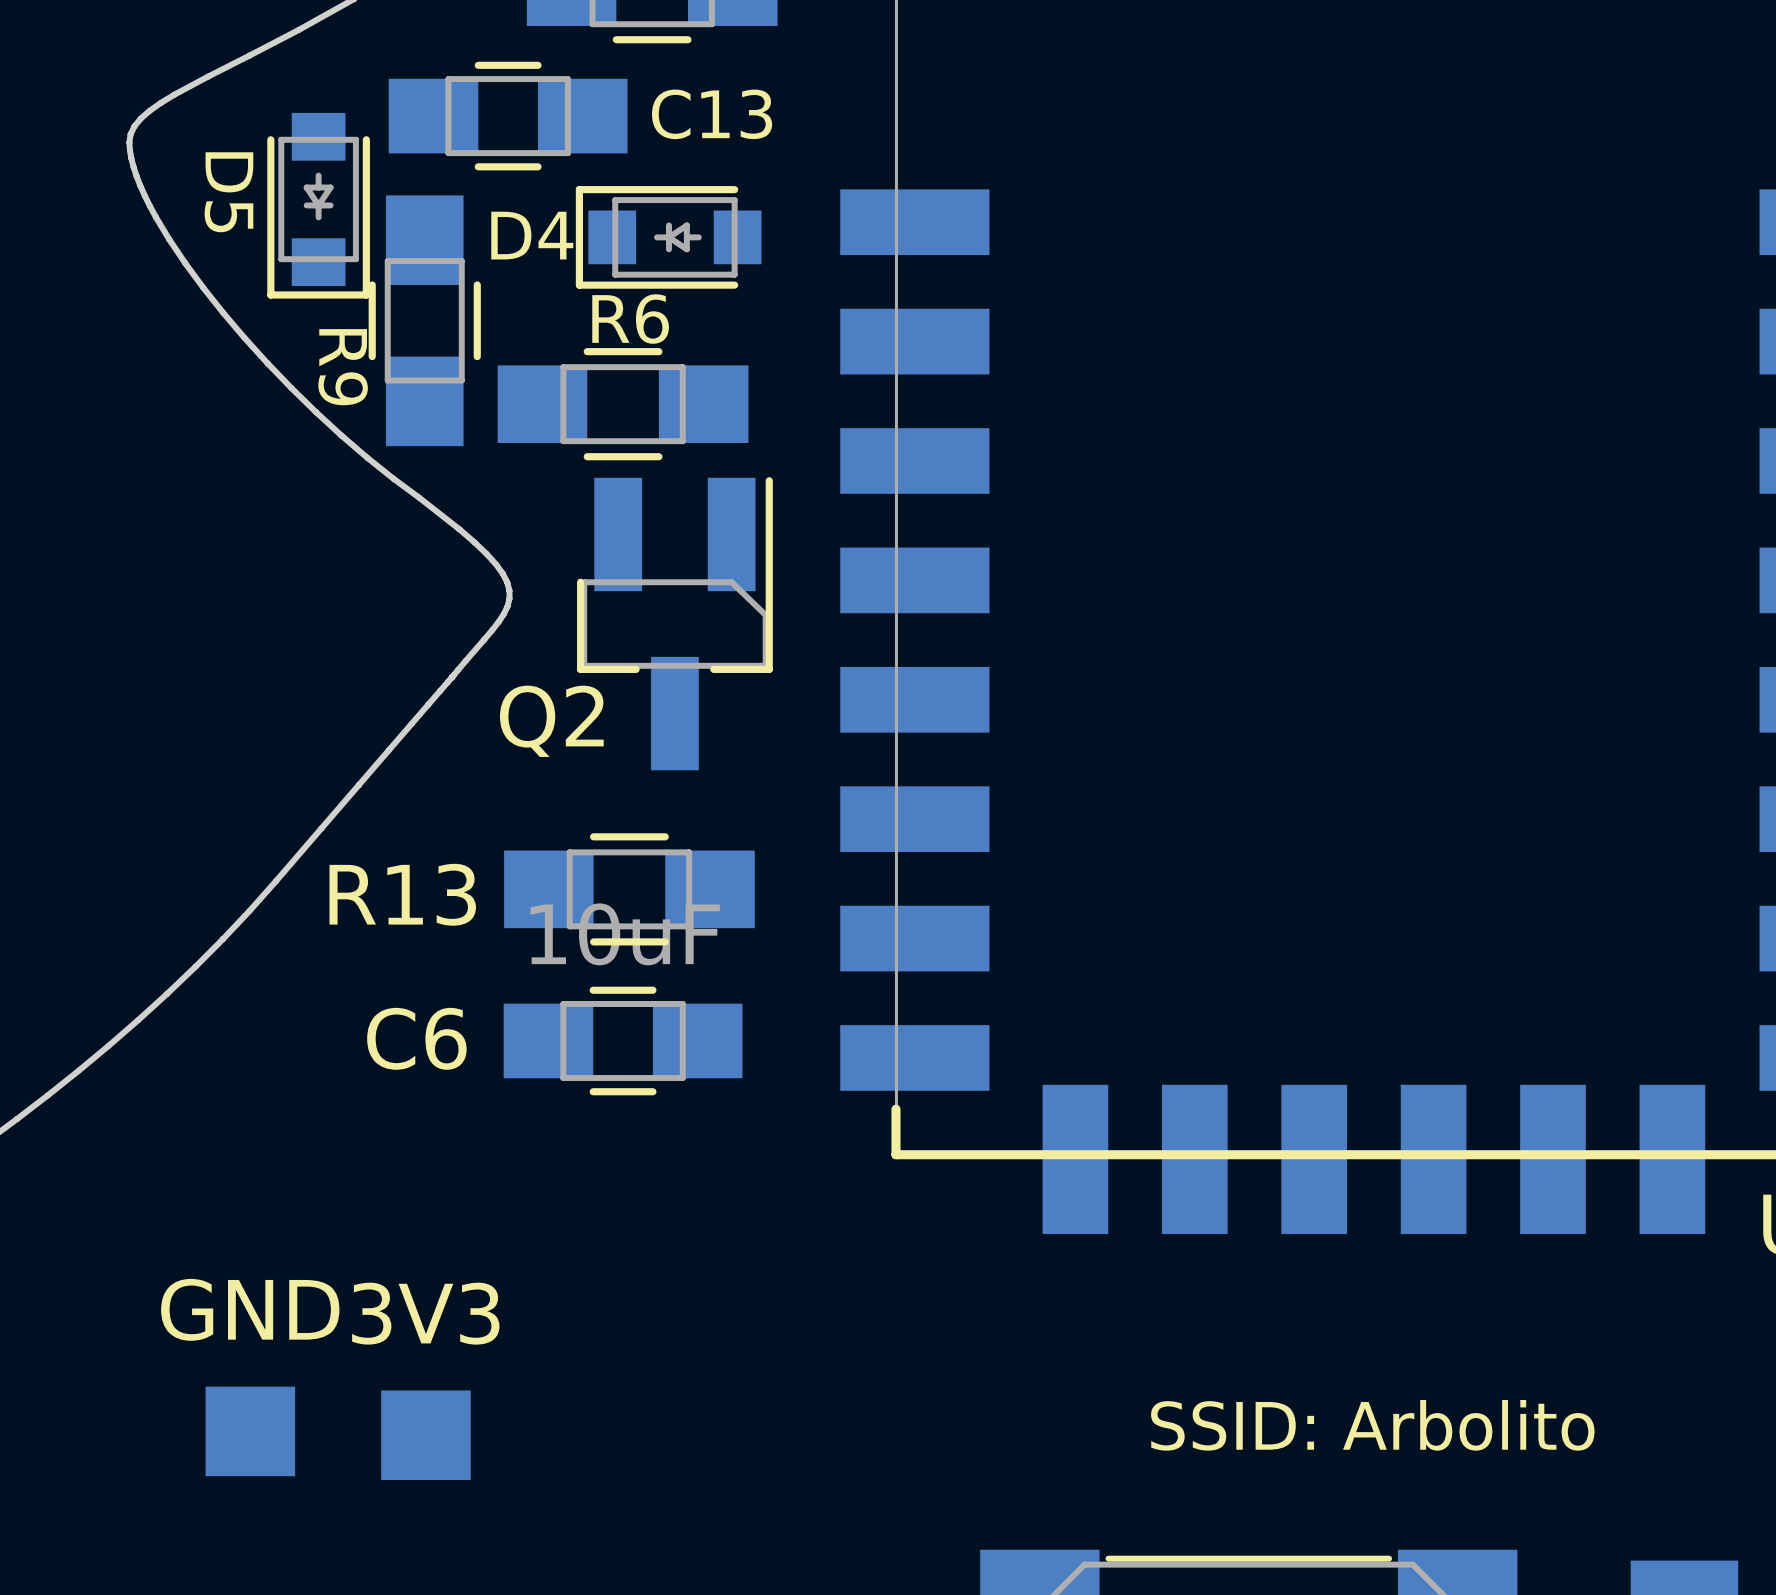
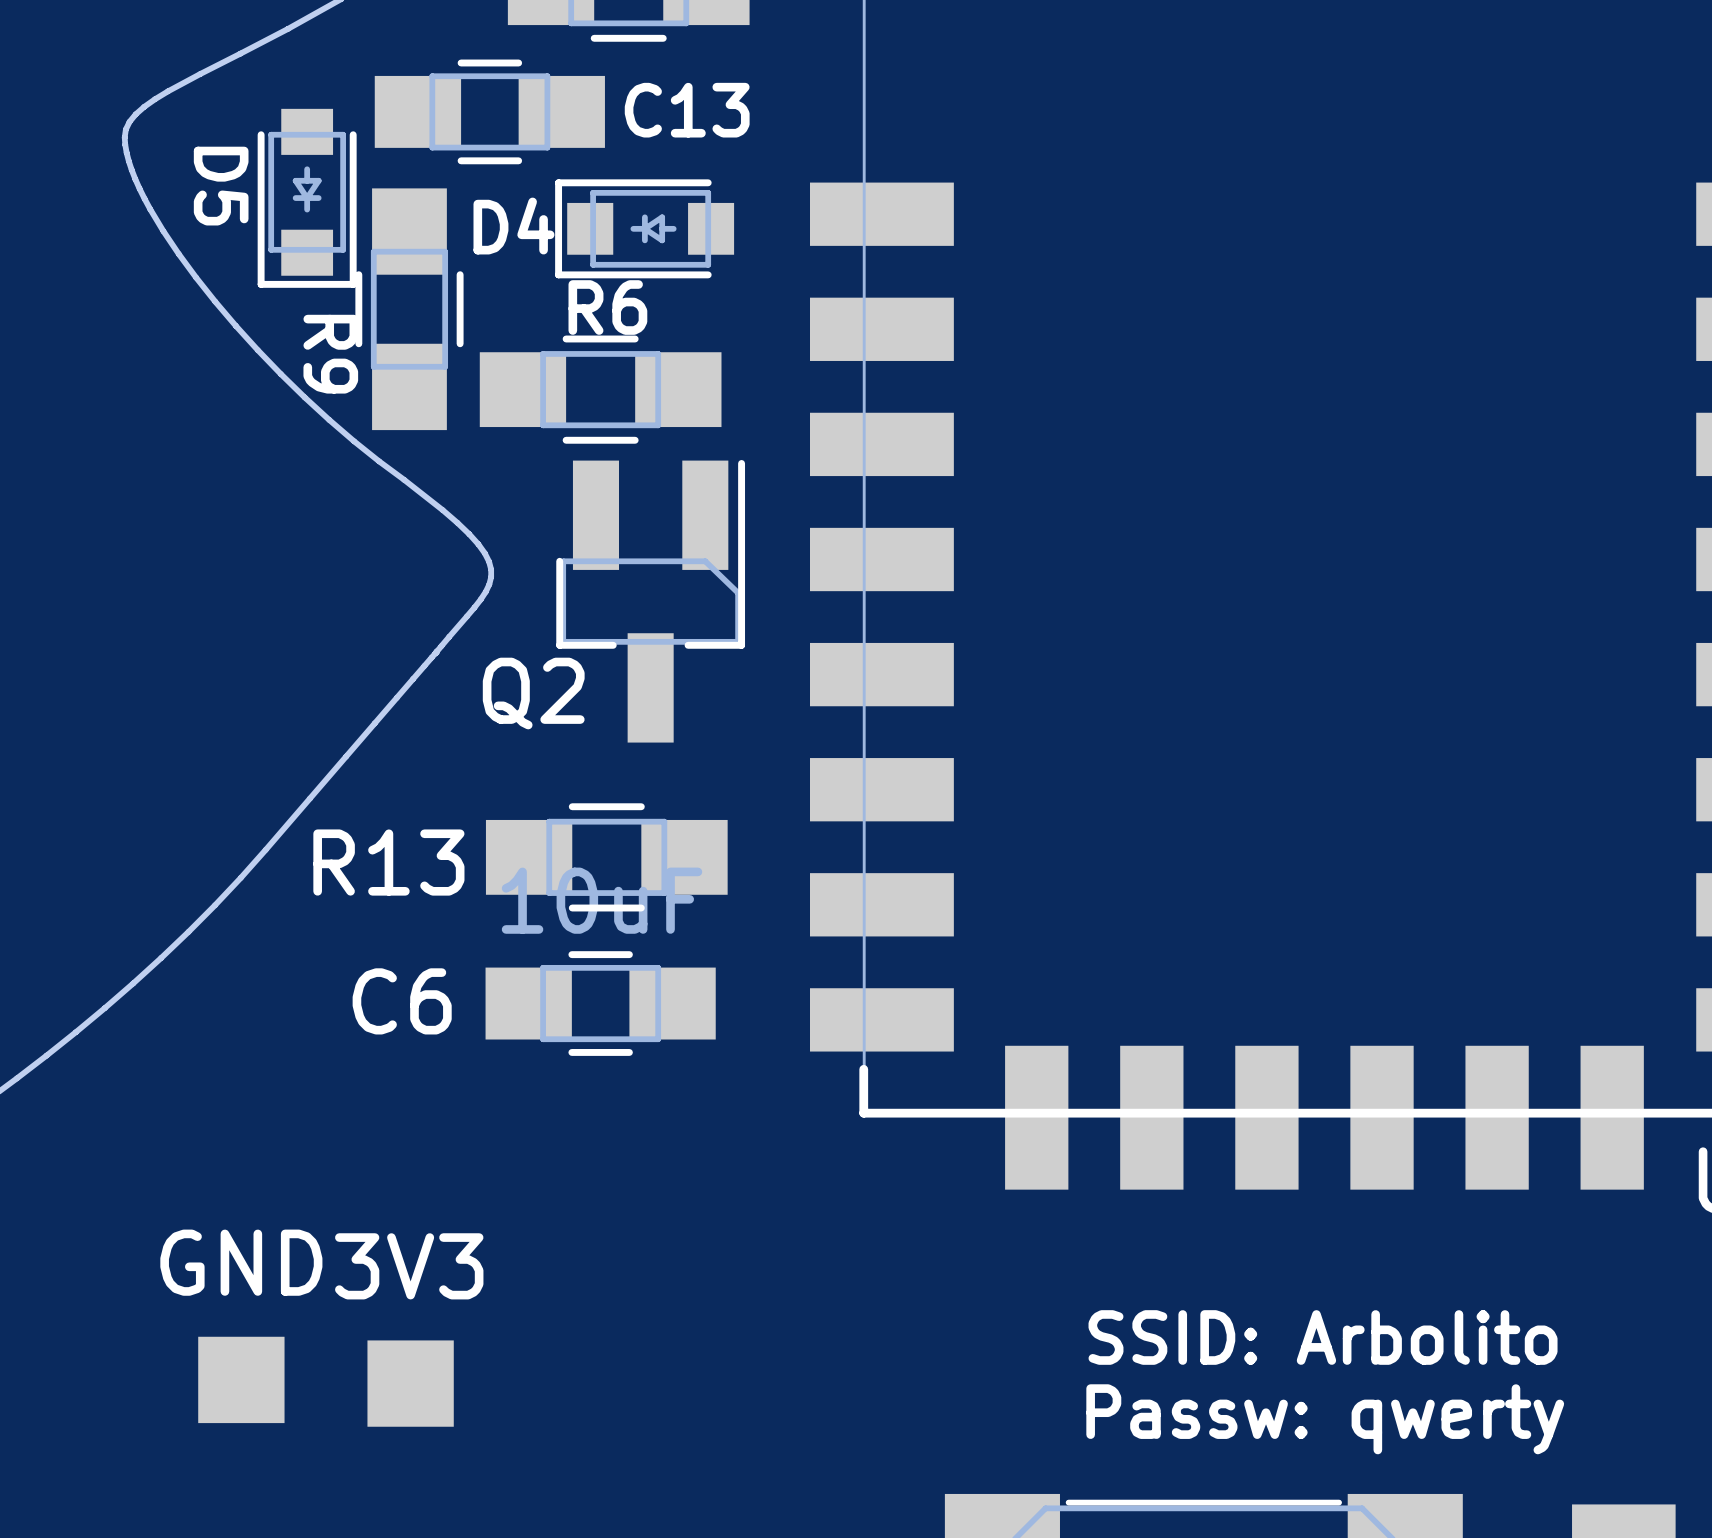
text position: SSID: Arbolito (1372, 1425) -> SSID: Arbolito (1323, 1337)
text: none -> Passw: qwerty (1325, 1419)

